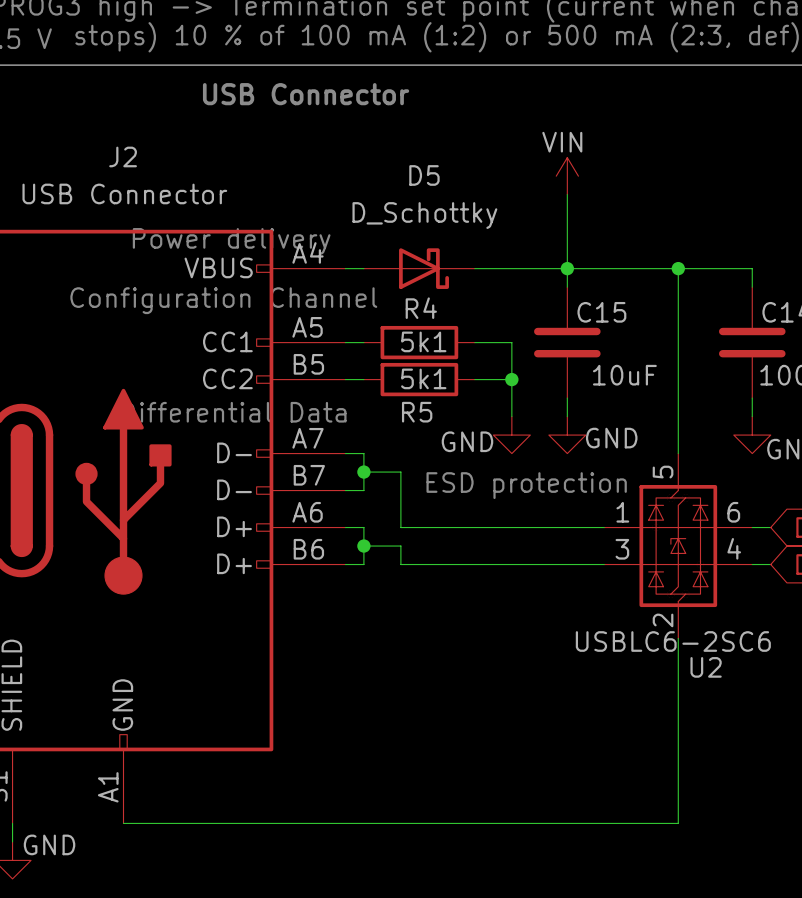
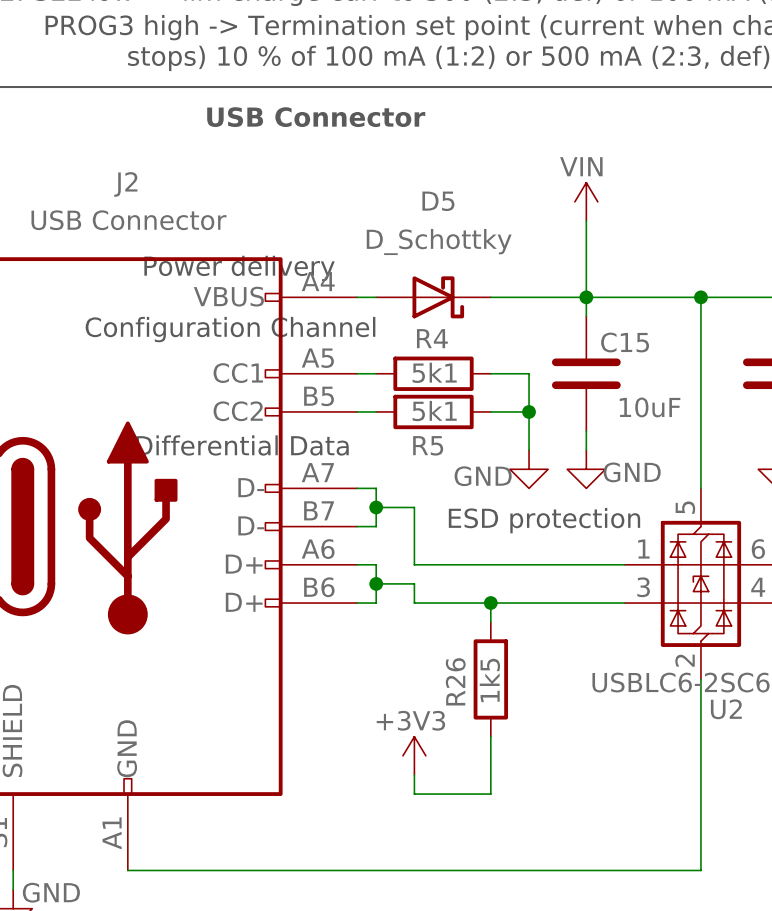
wire: none -> (490, 603) (490, 622)
junction: none -> (490, 603)
R26: none -> 1k5 (490, 679)
wire: none -> (490, 736) (490, 794) (414, 794) (414, 774)
power symbol: none -> +3V3 (414, 755)

